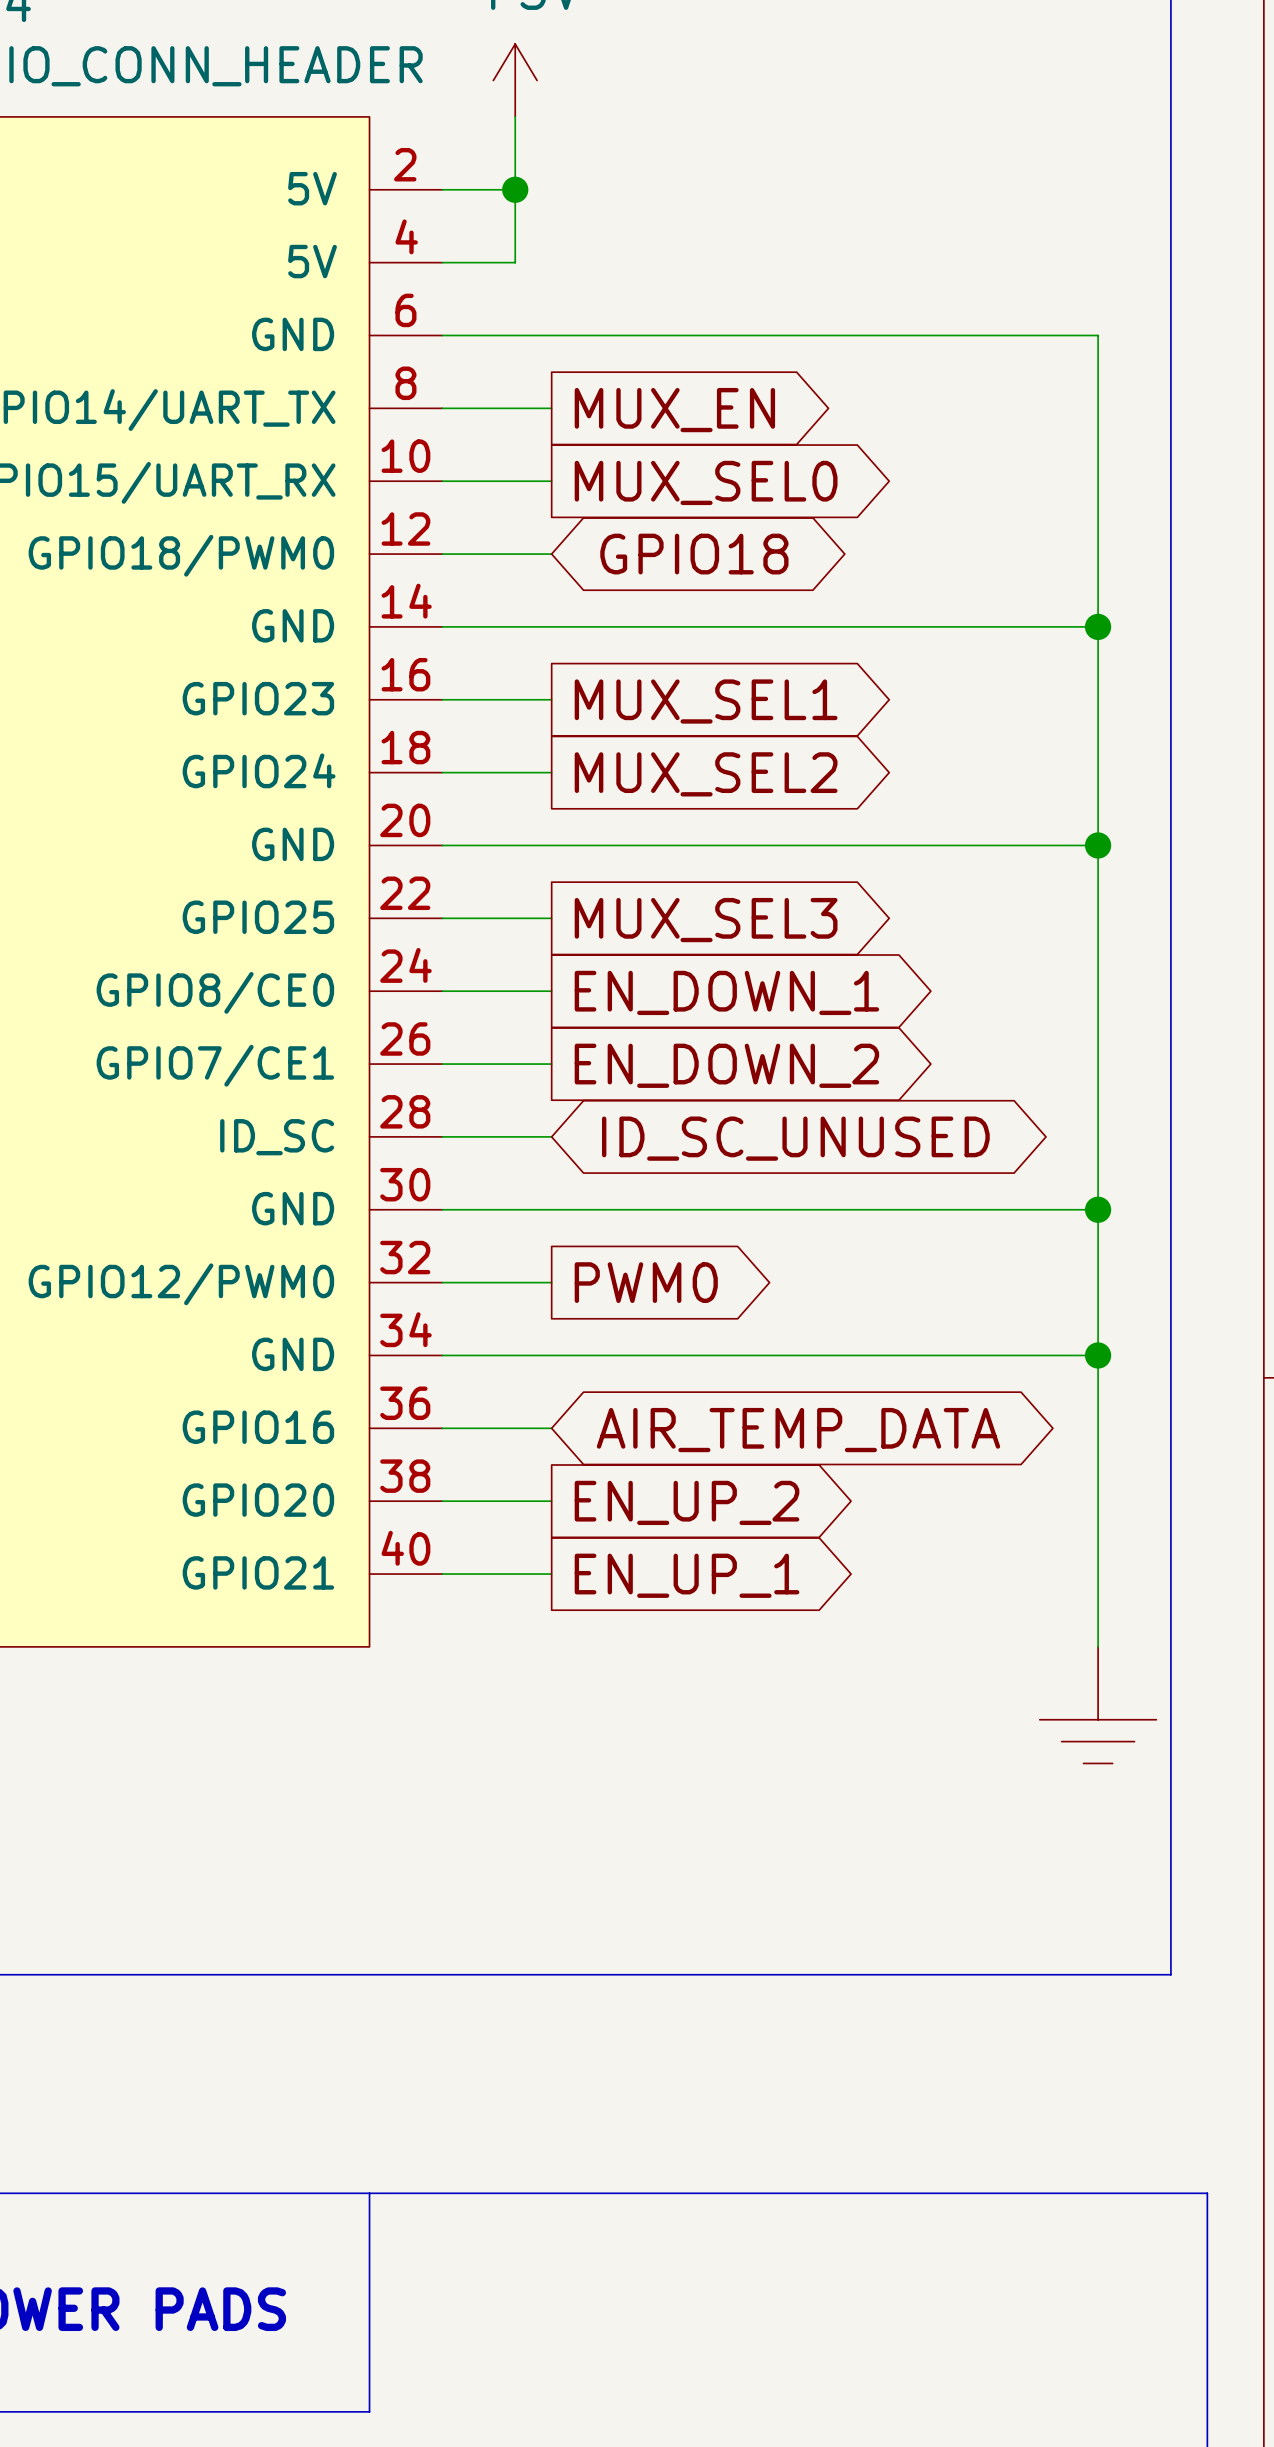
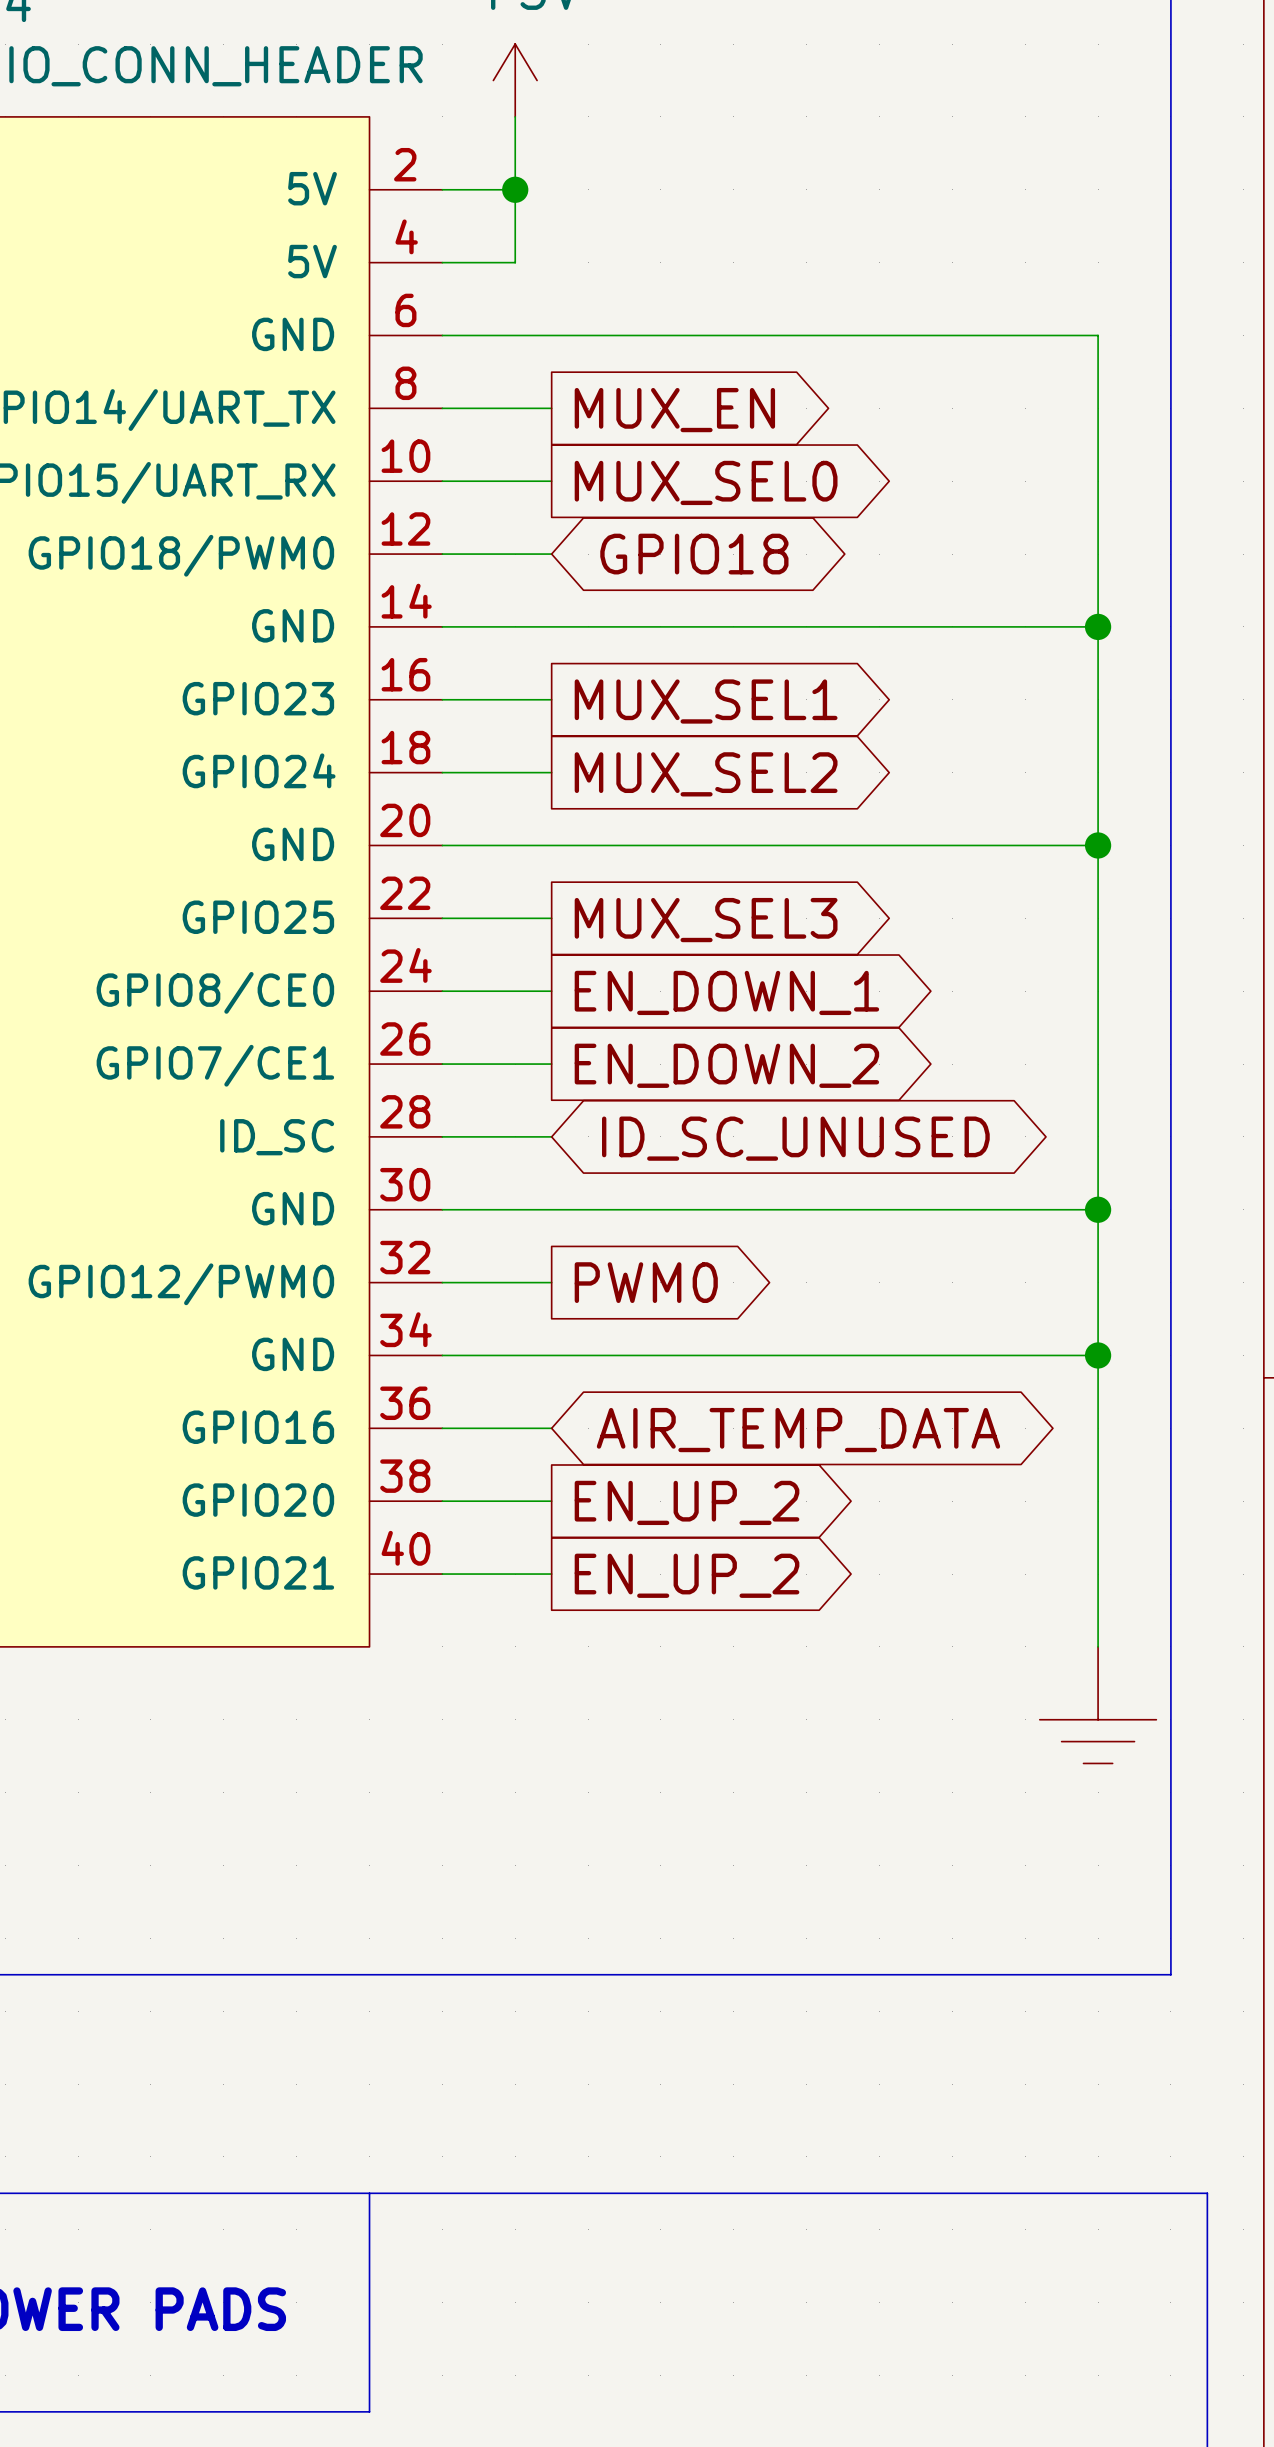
global label: EN_UP_1 (687, 1575) -> EN_UP_2 (687, 1575)

